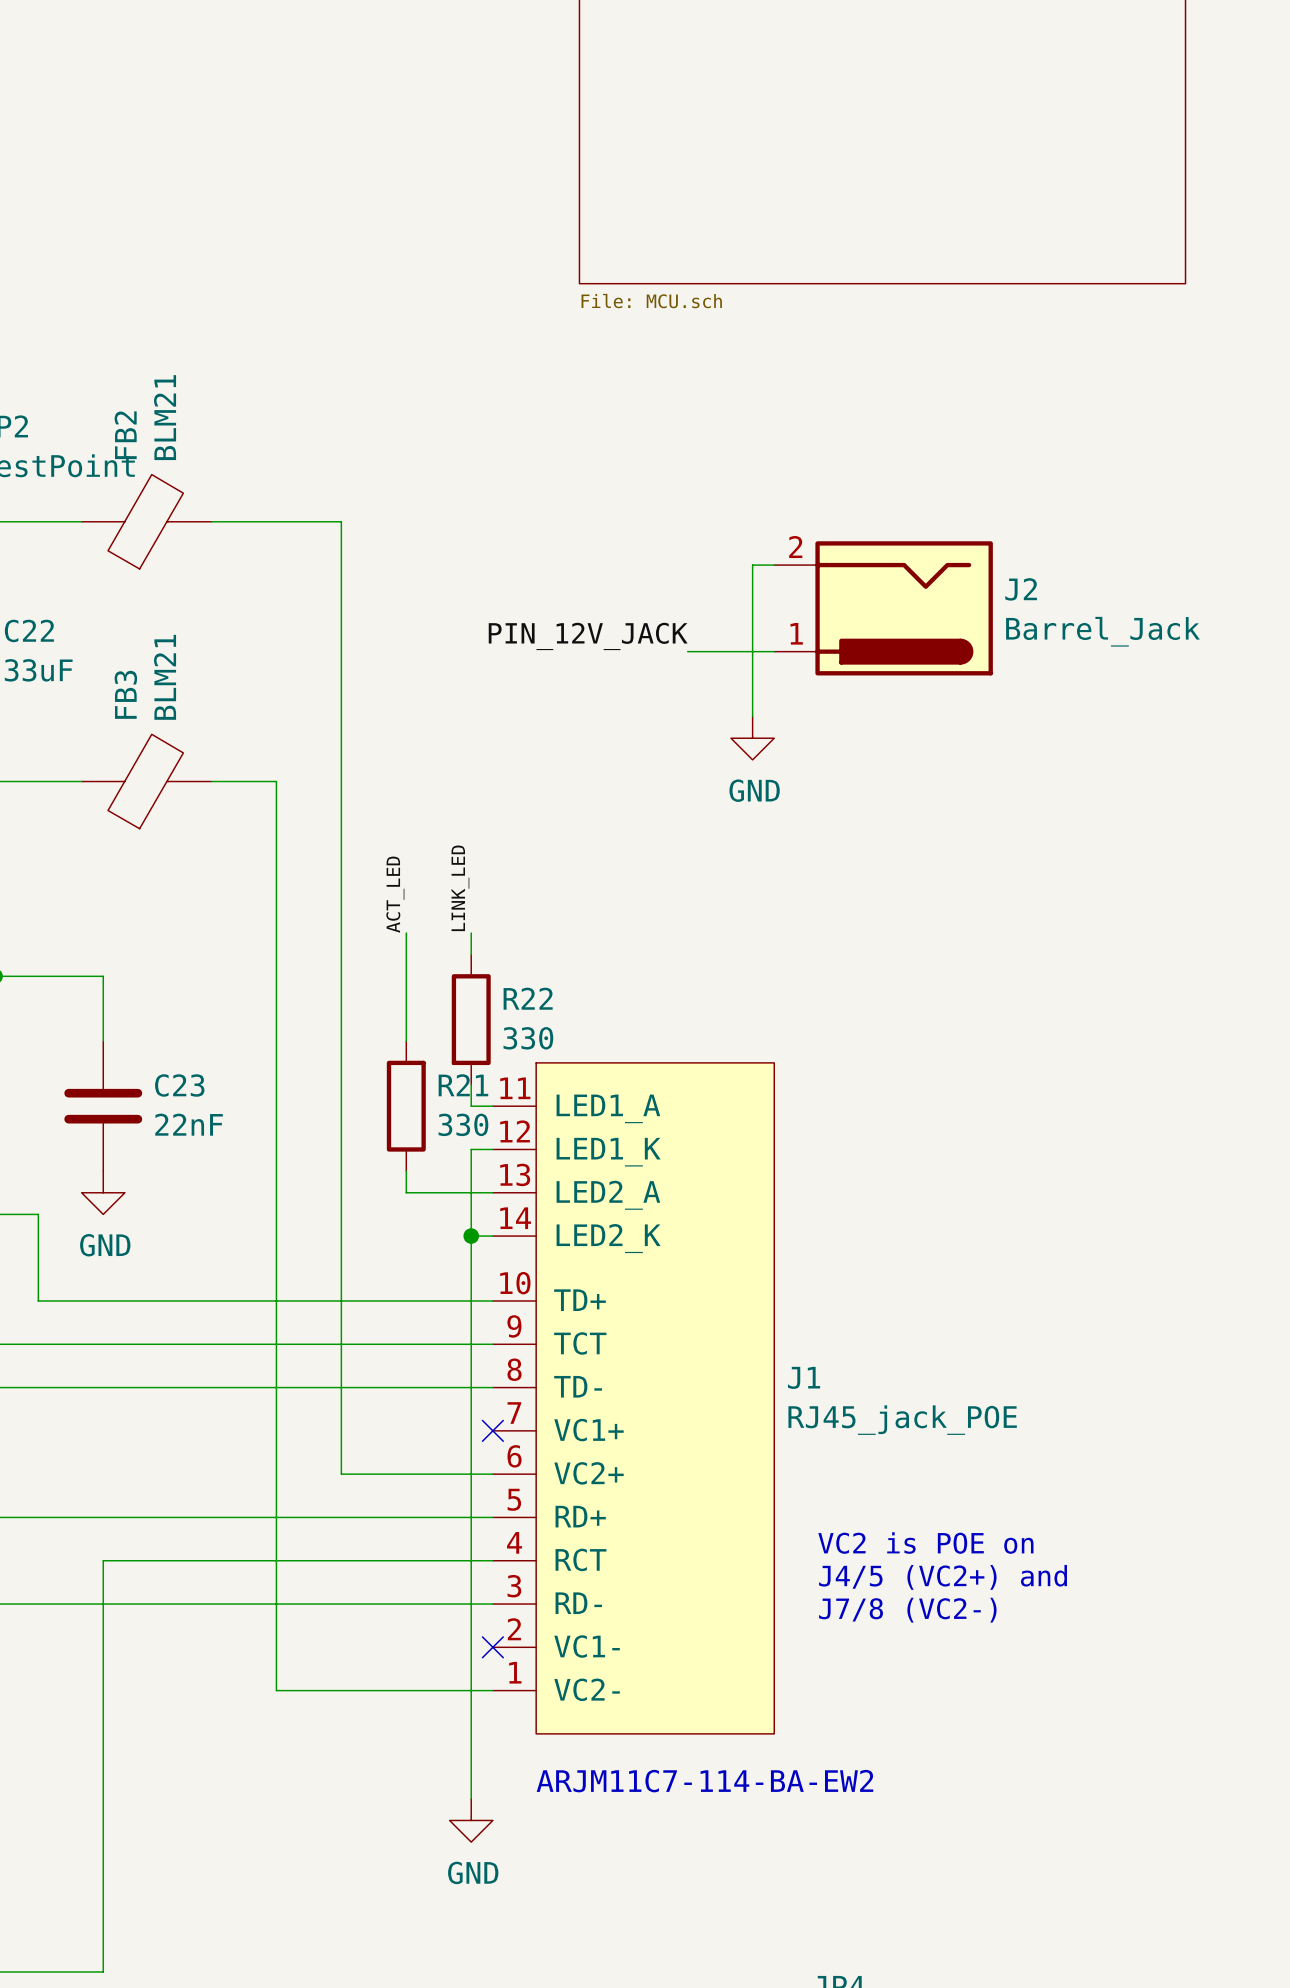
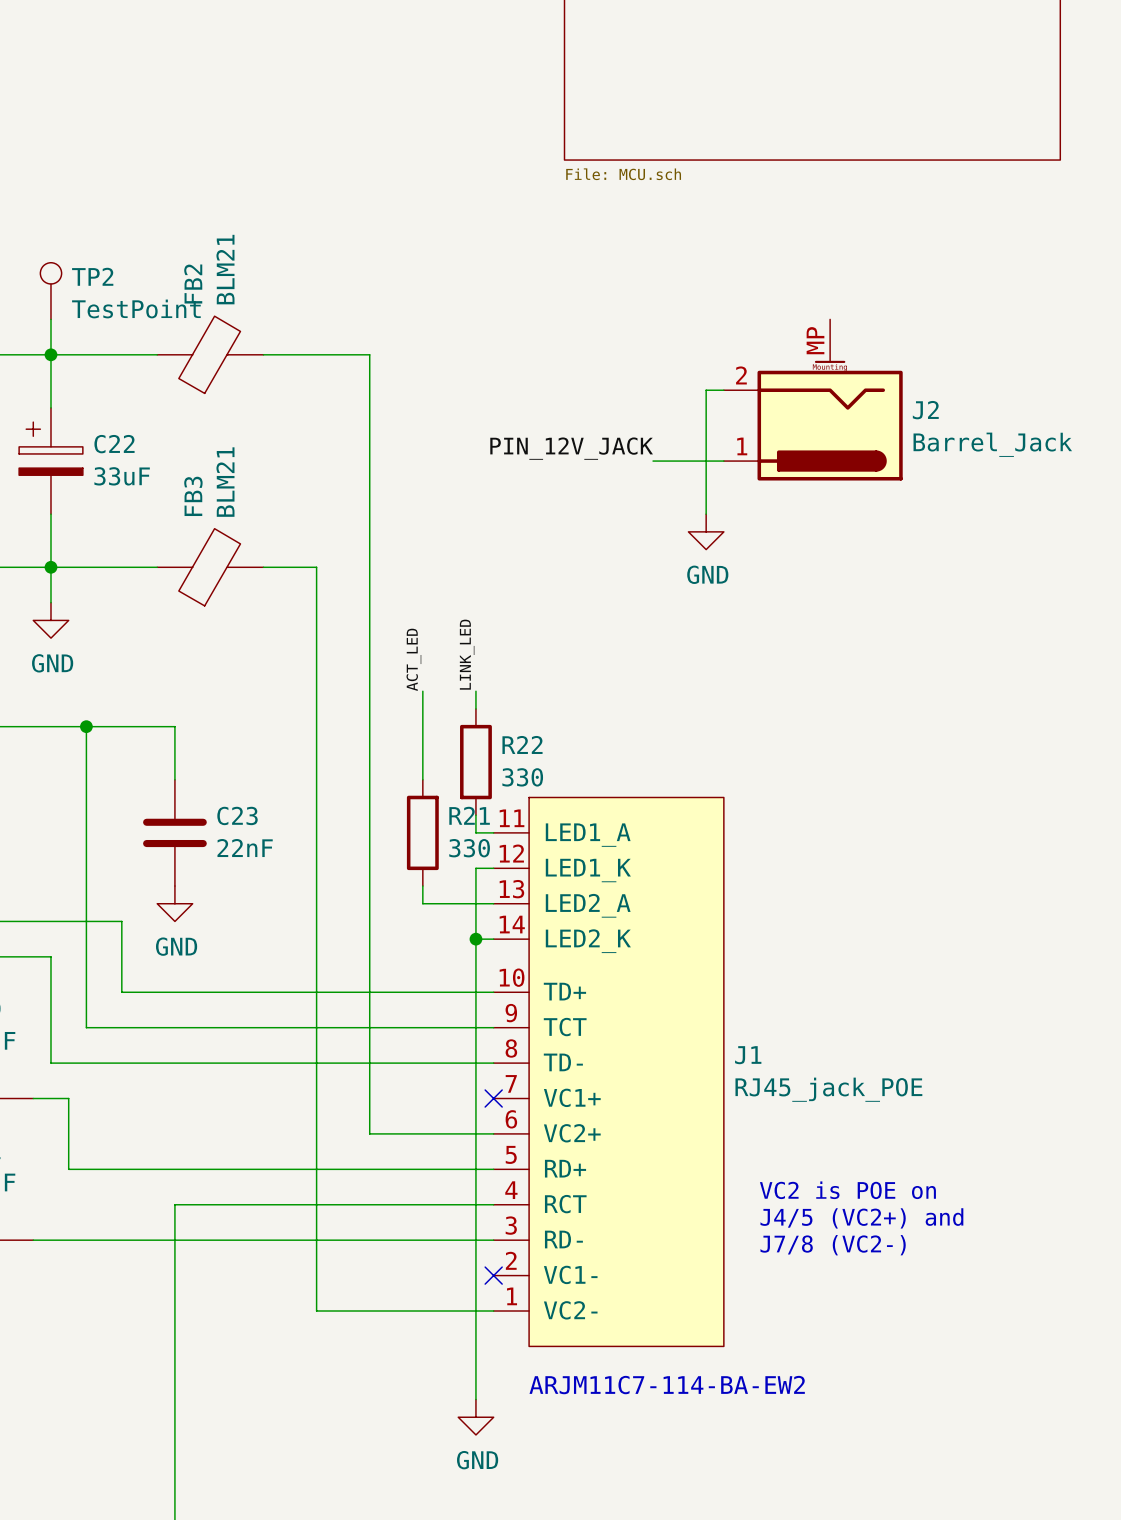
J2 symbol: [774, 541, 993, 676] -> [723, 319, 903, 481]

